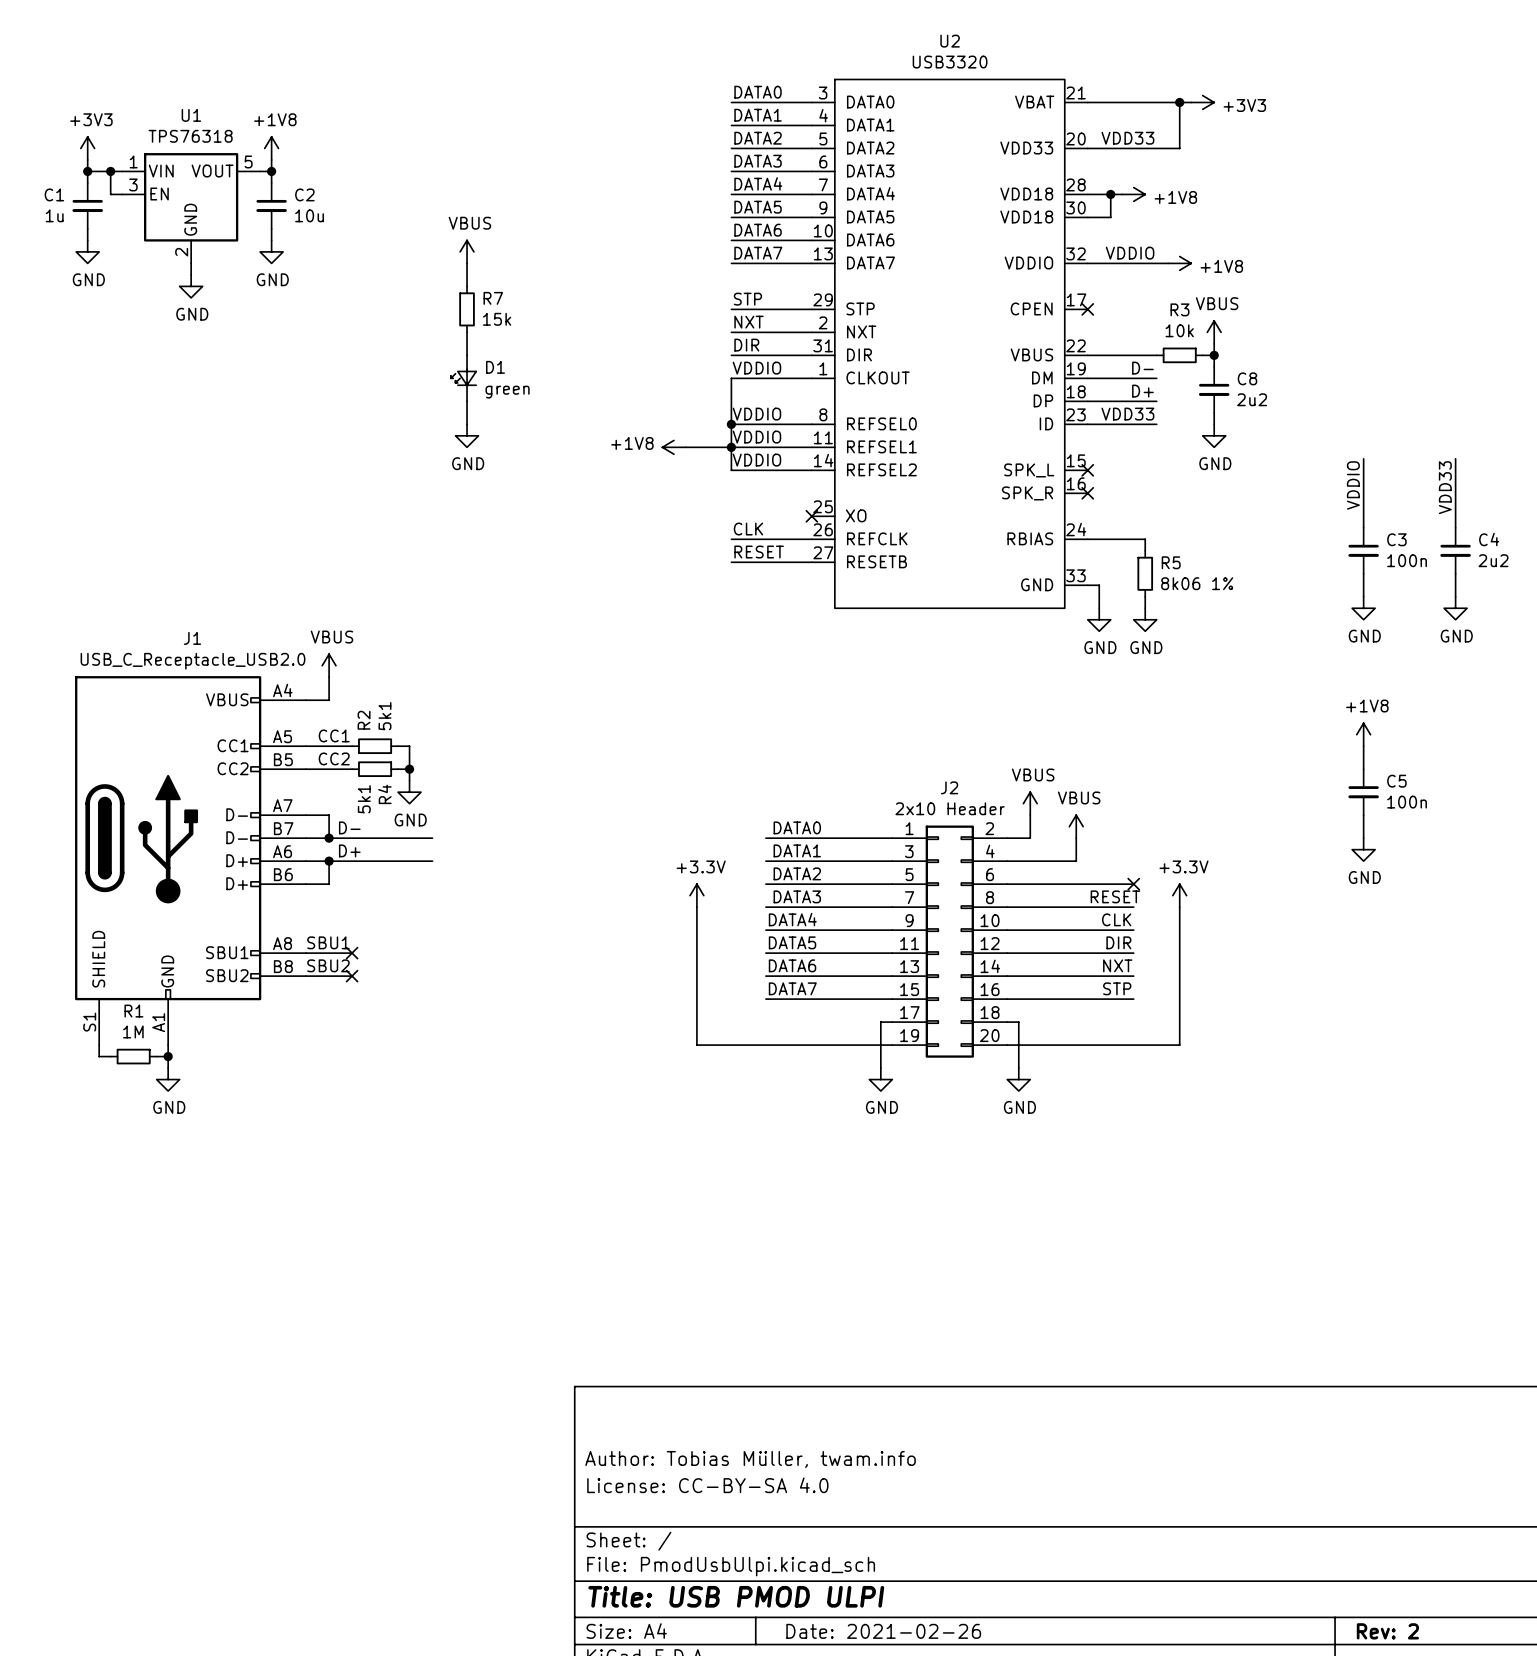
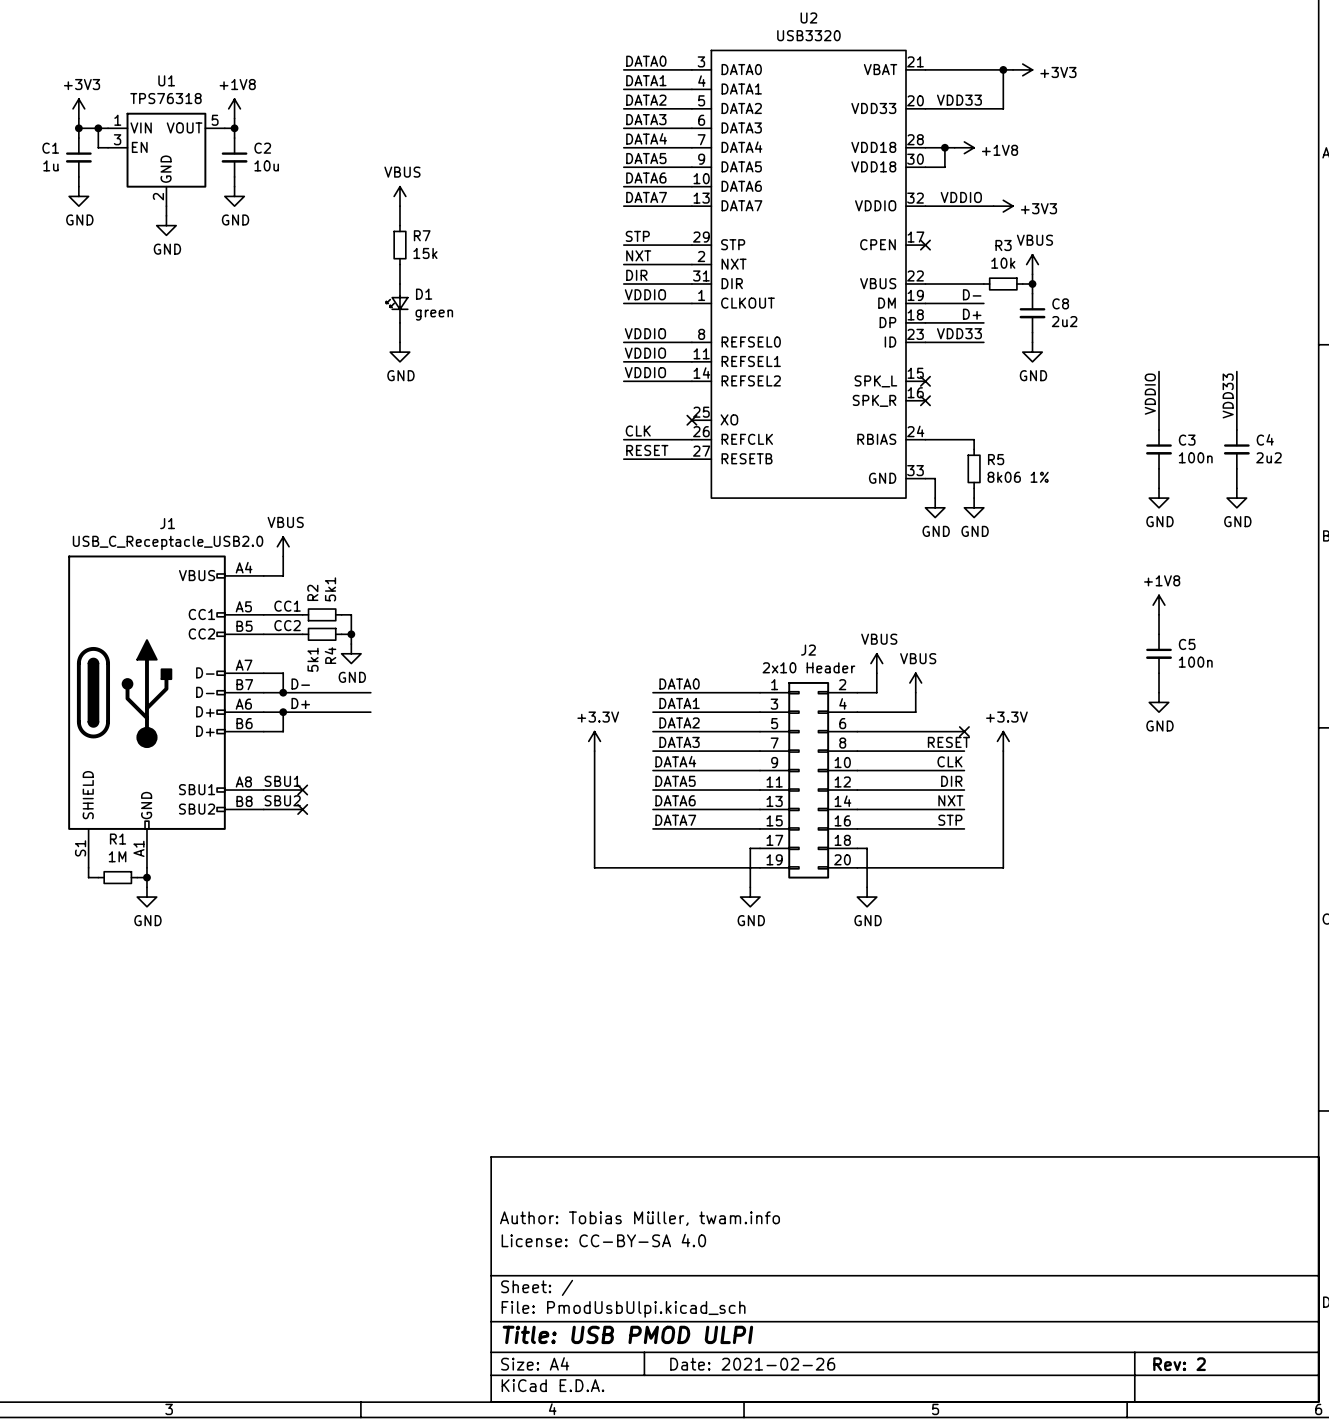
power symbol: +1V8 (1179, 263) -> +3V3 (1003, 206)
wire: (731, 378) (731, 470) -> none
junction: (731, 424) -> none
power symbol: +1V8 (673, 447) -> none
wire: (685, 447) (731, 447) -> none
junction: (731, 447) -> none

